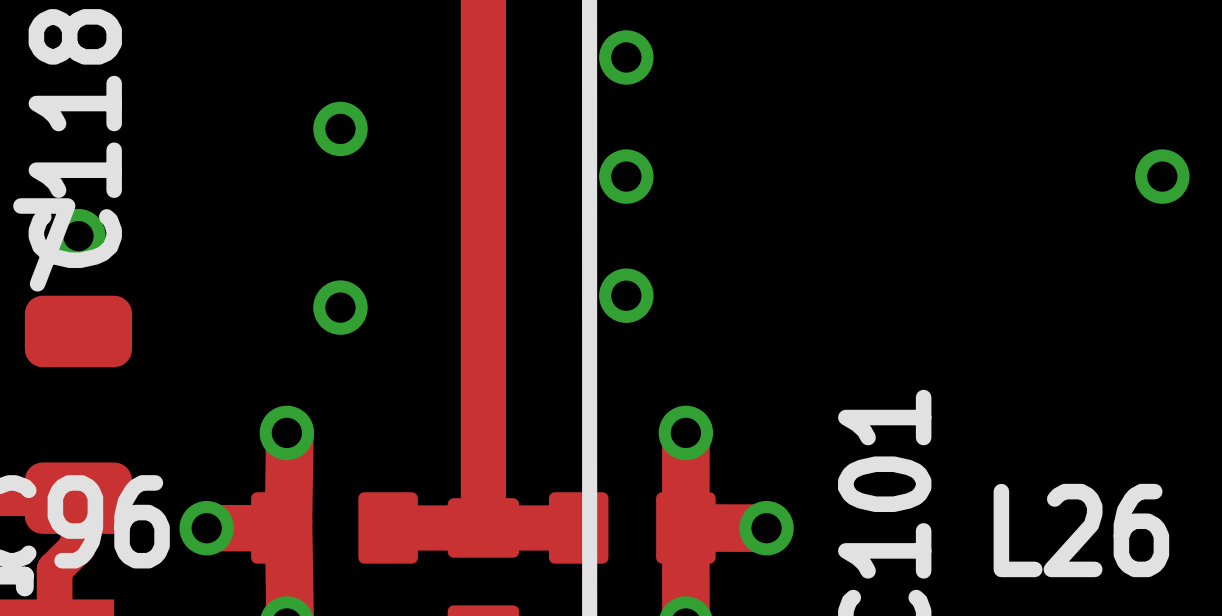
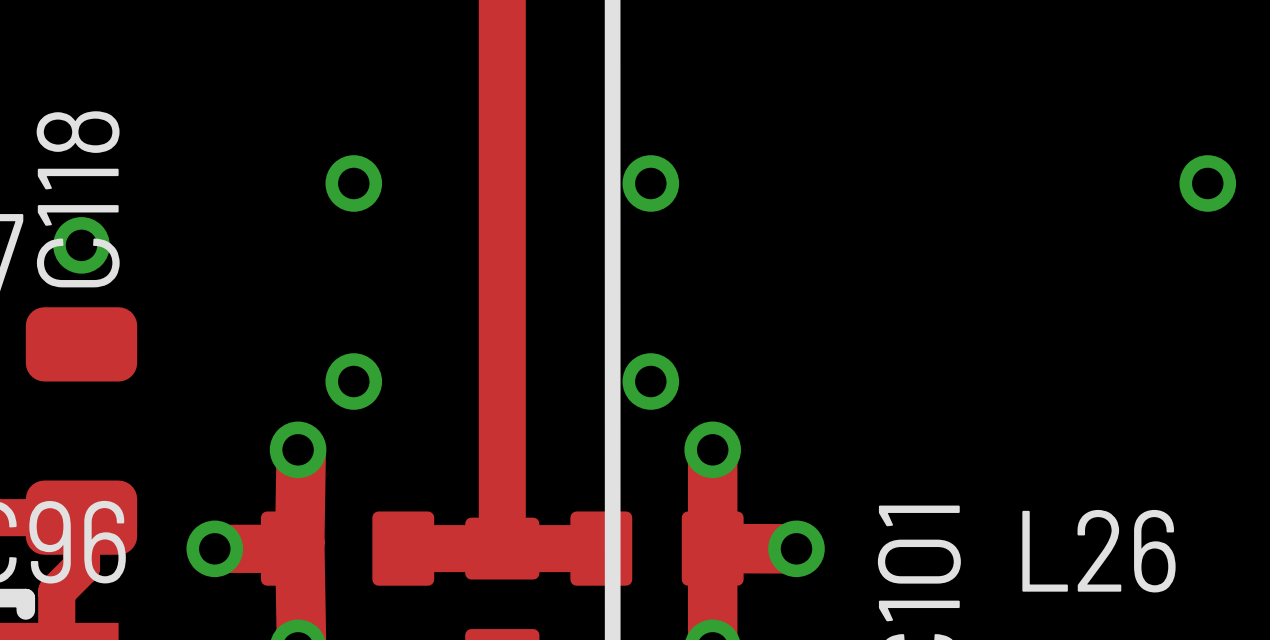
via: (626, 57) -> none
via position: (340, 128) -> (353, 183)
via position: (626, 295) -> (650, 381)
via position: (340, 307) -> (353, 381)

